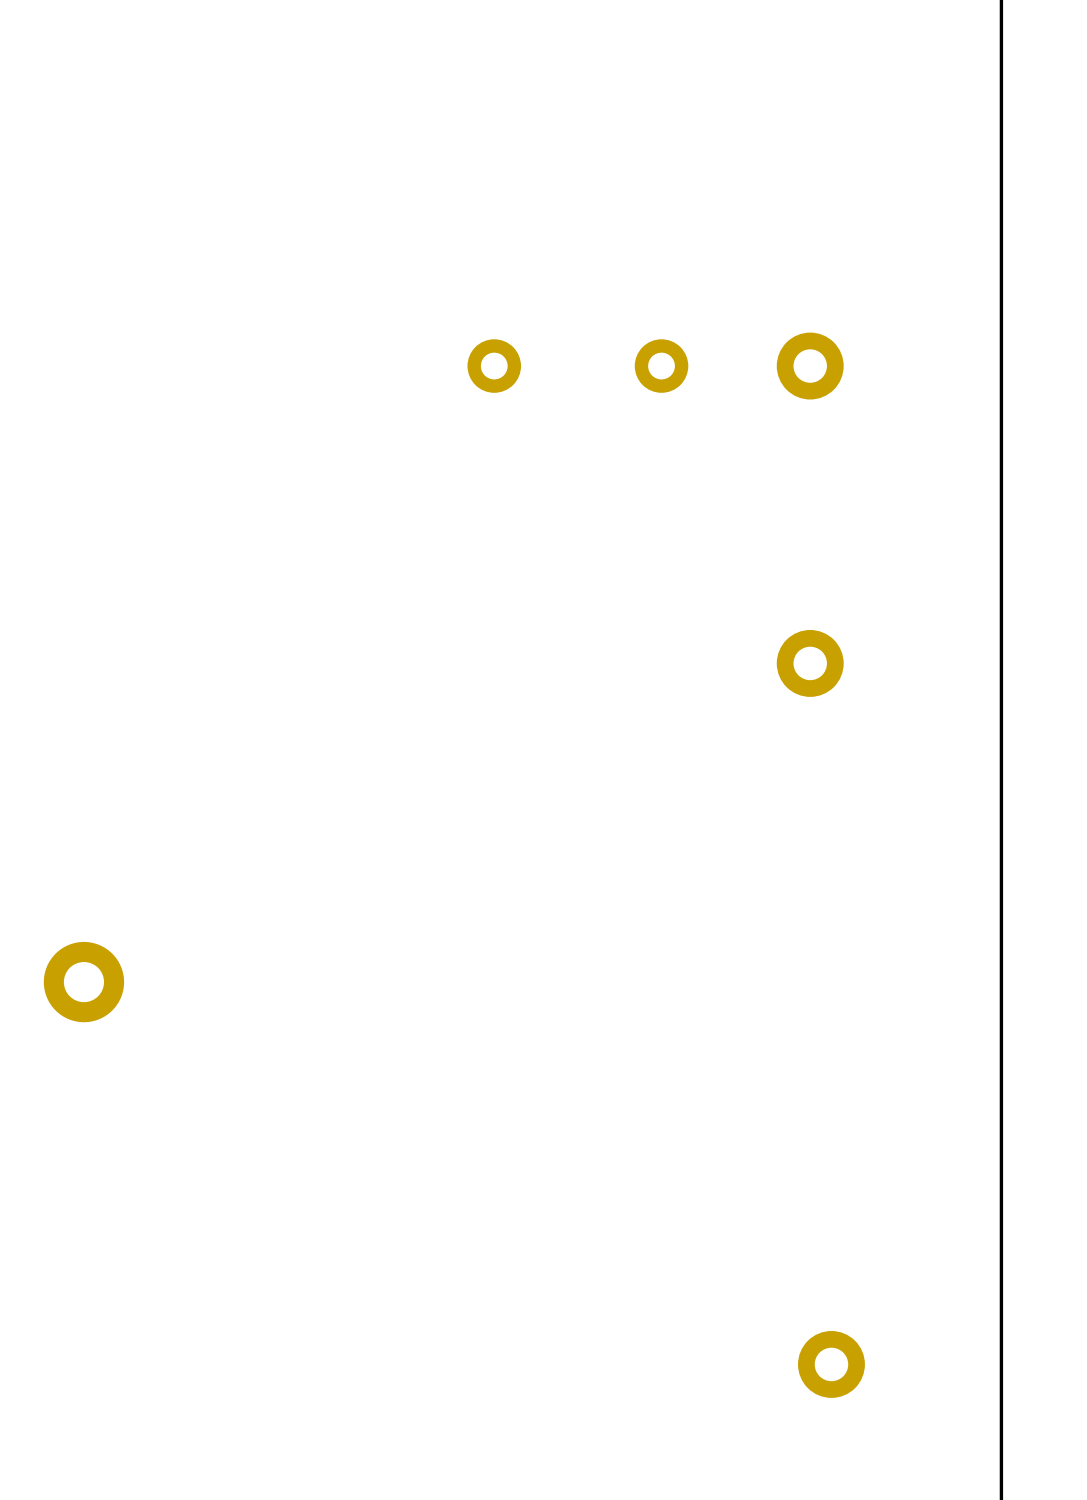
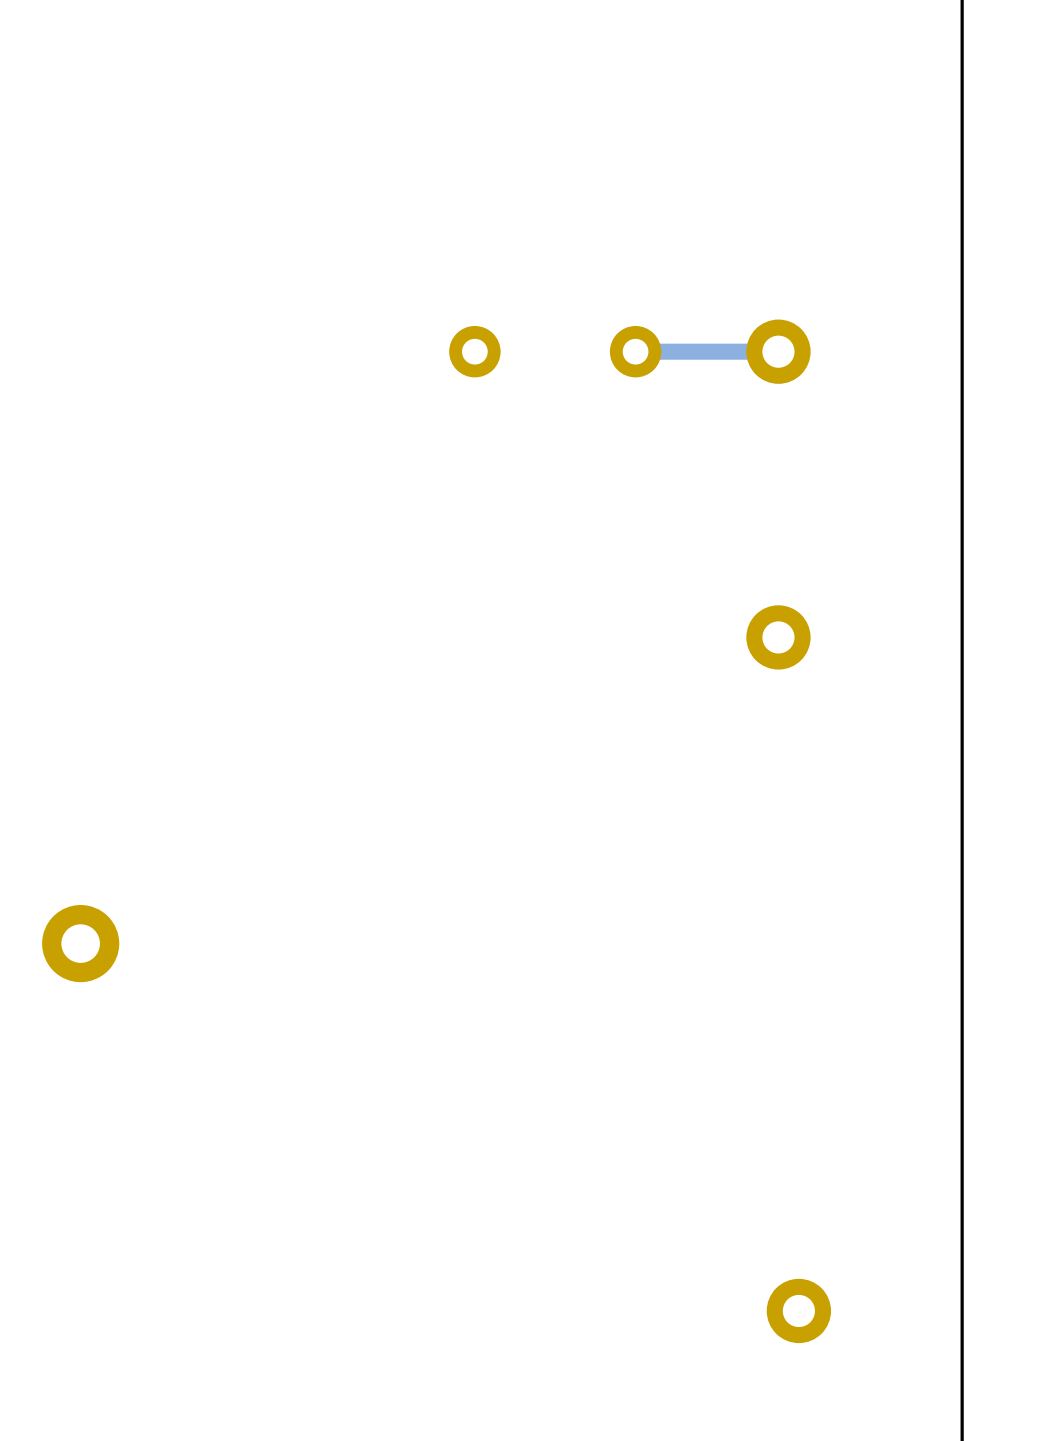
track: none -> (778, 351) (635, 351)

